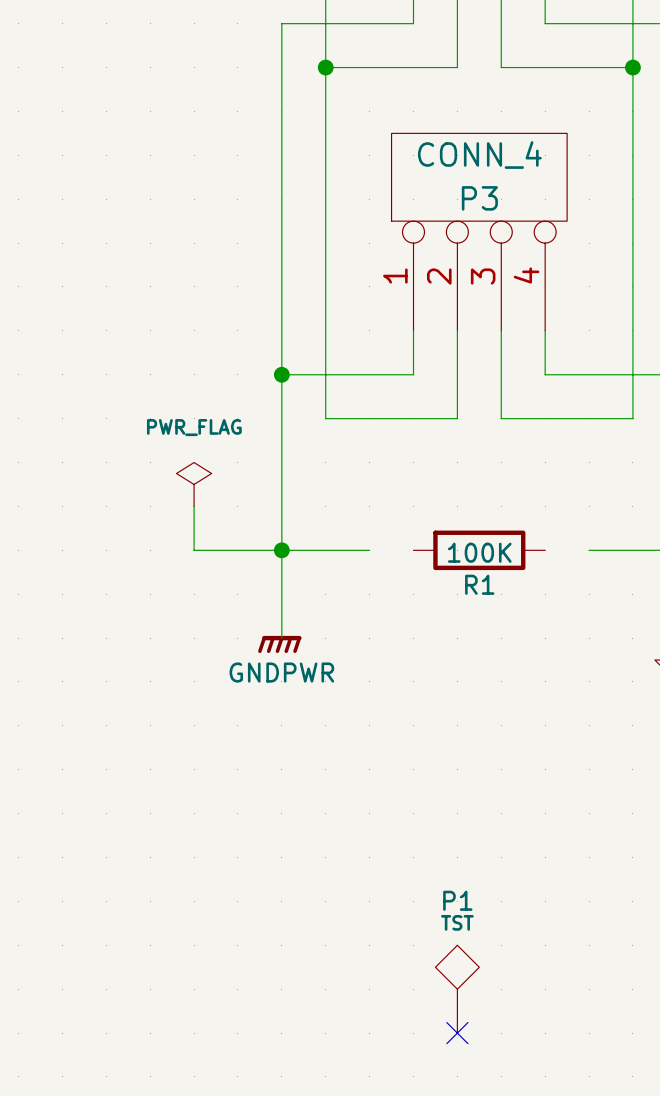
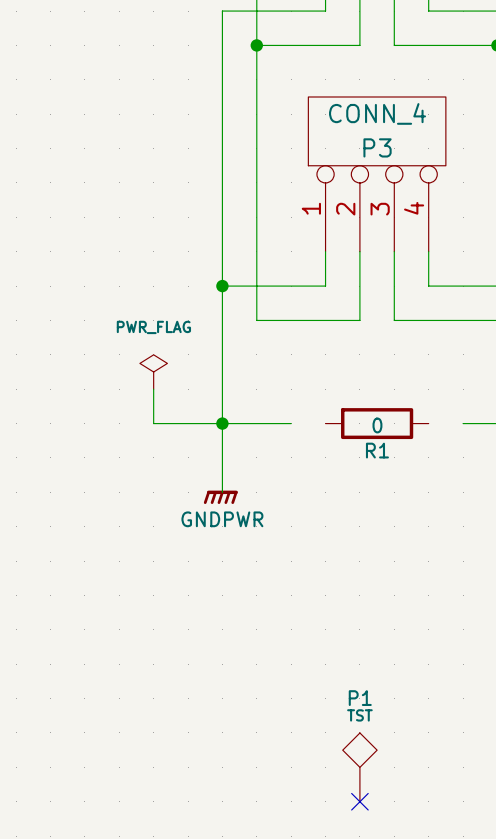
R1 value: 100K (479, 552) -> 0 (377, 425)

